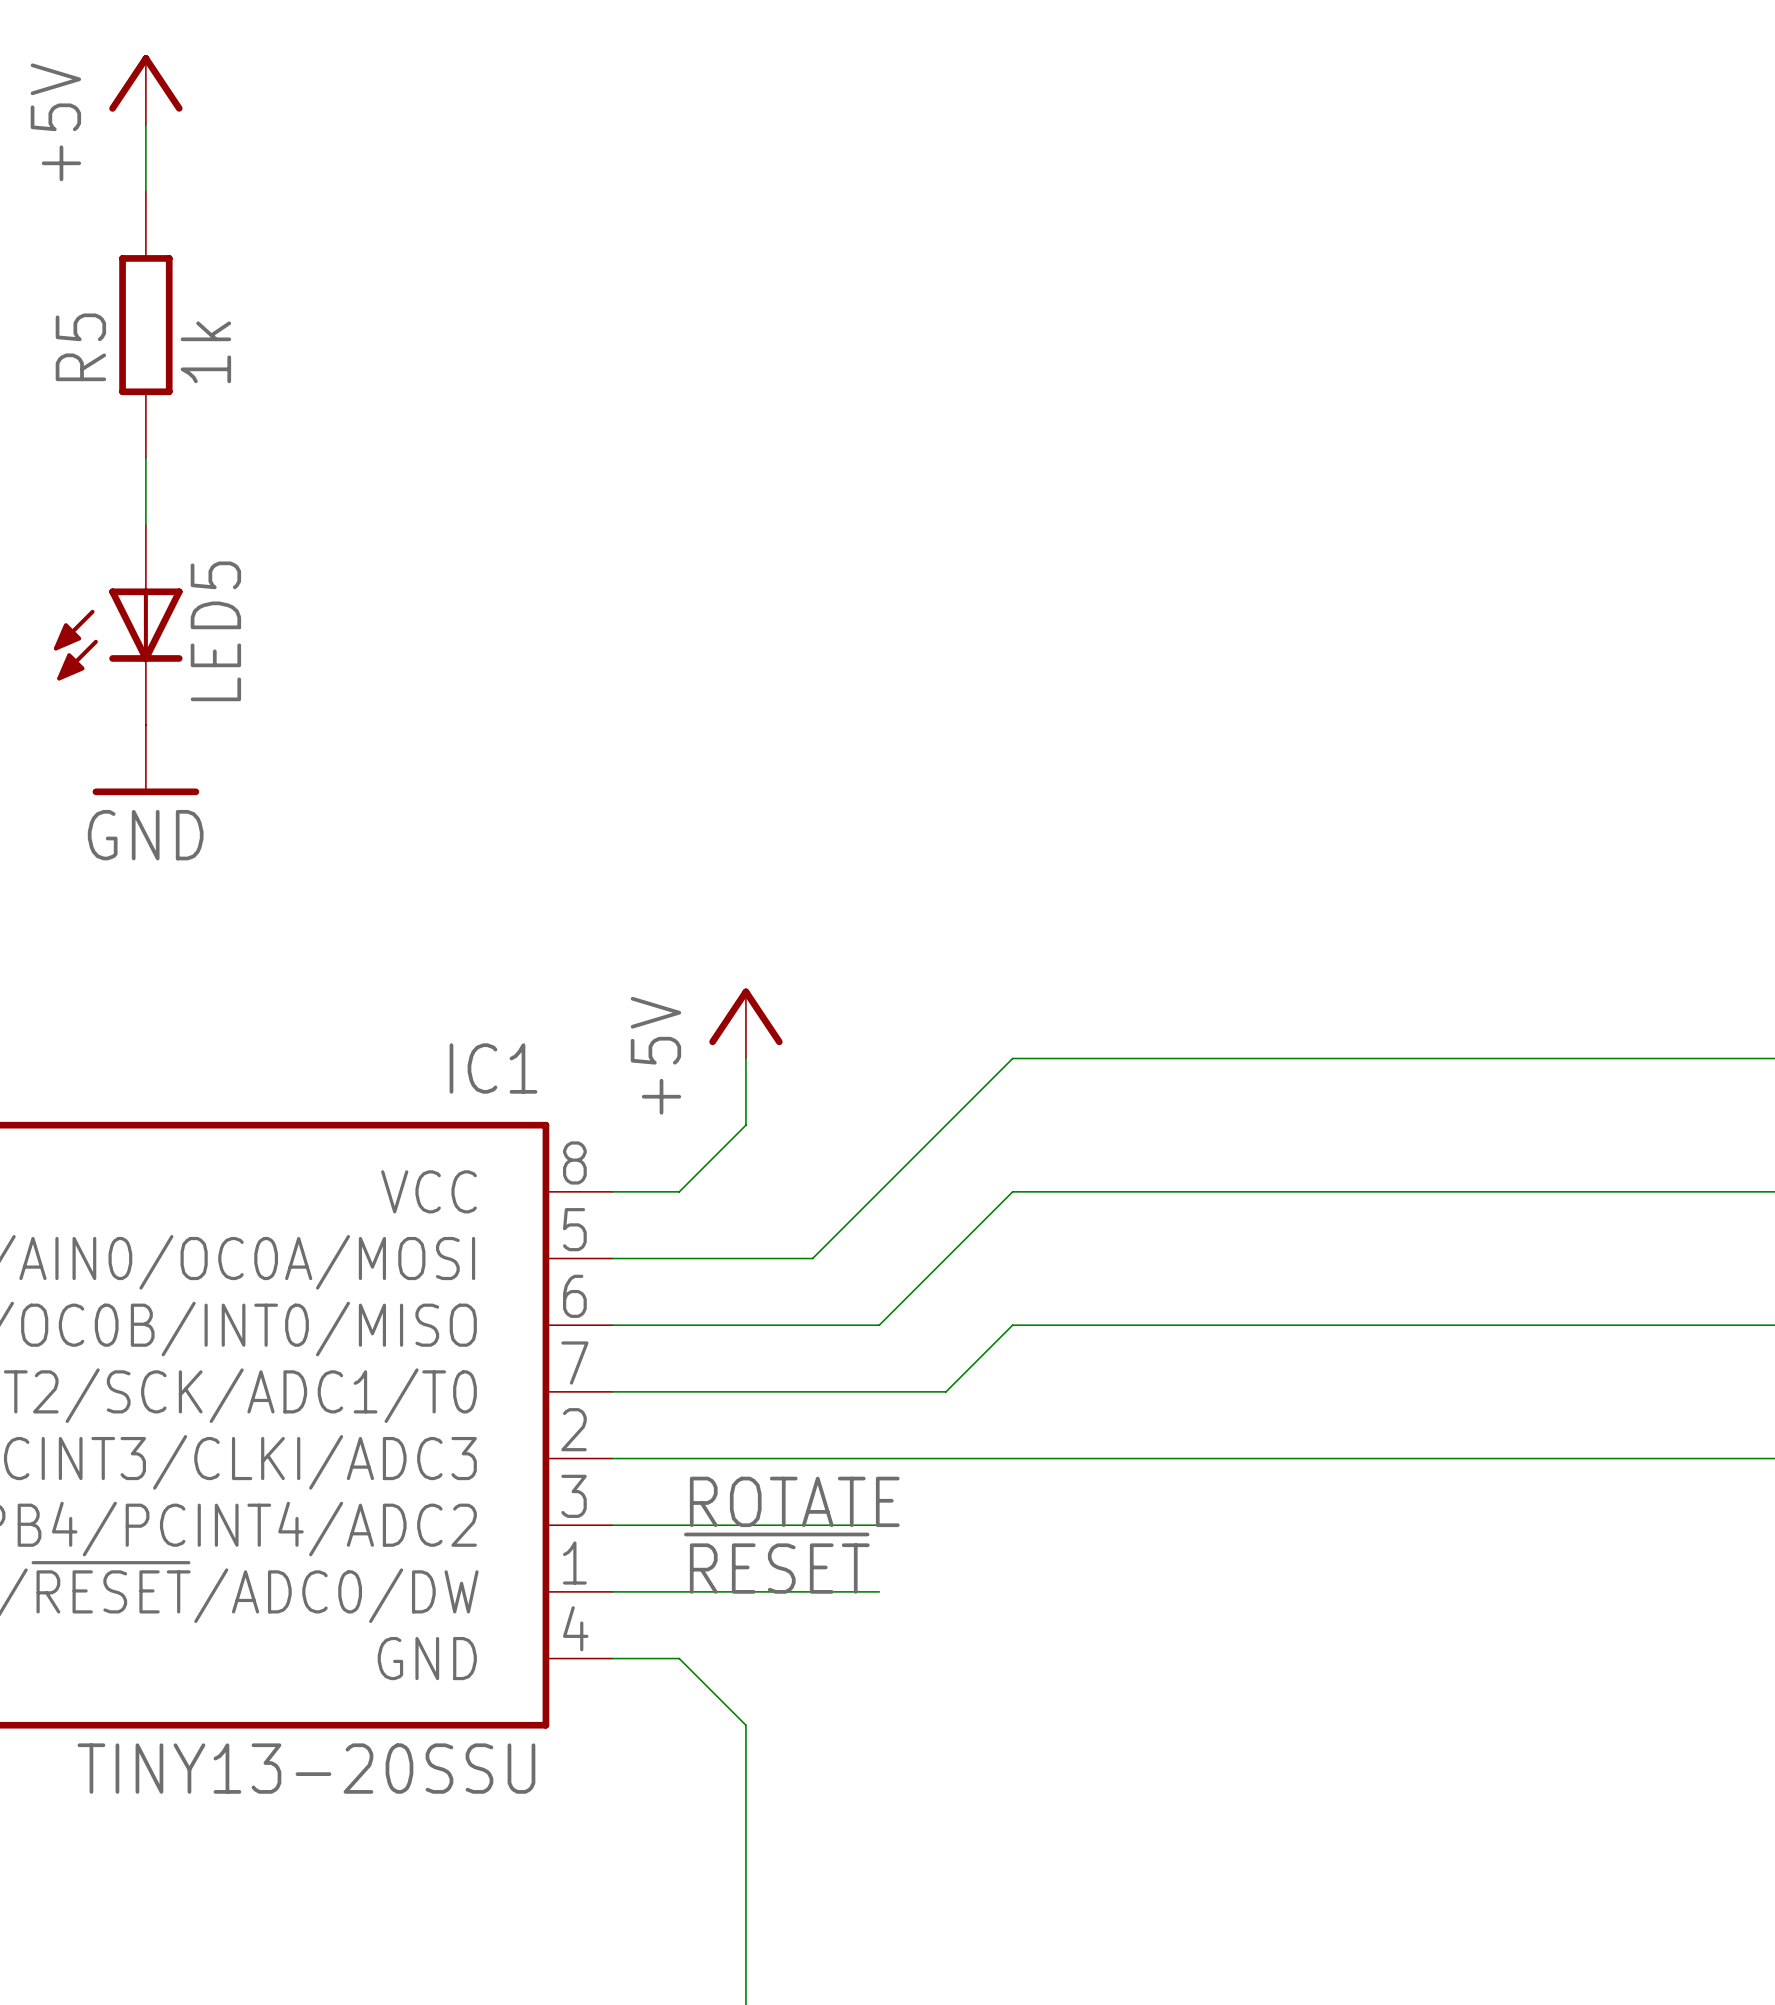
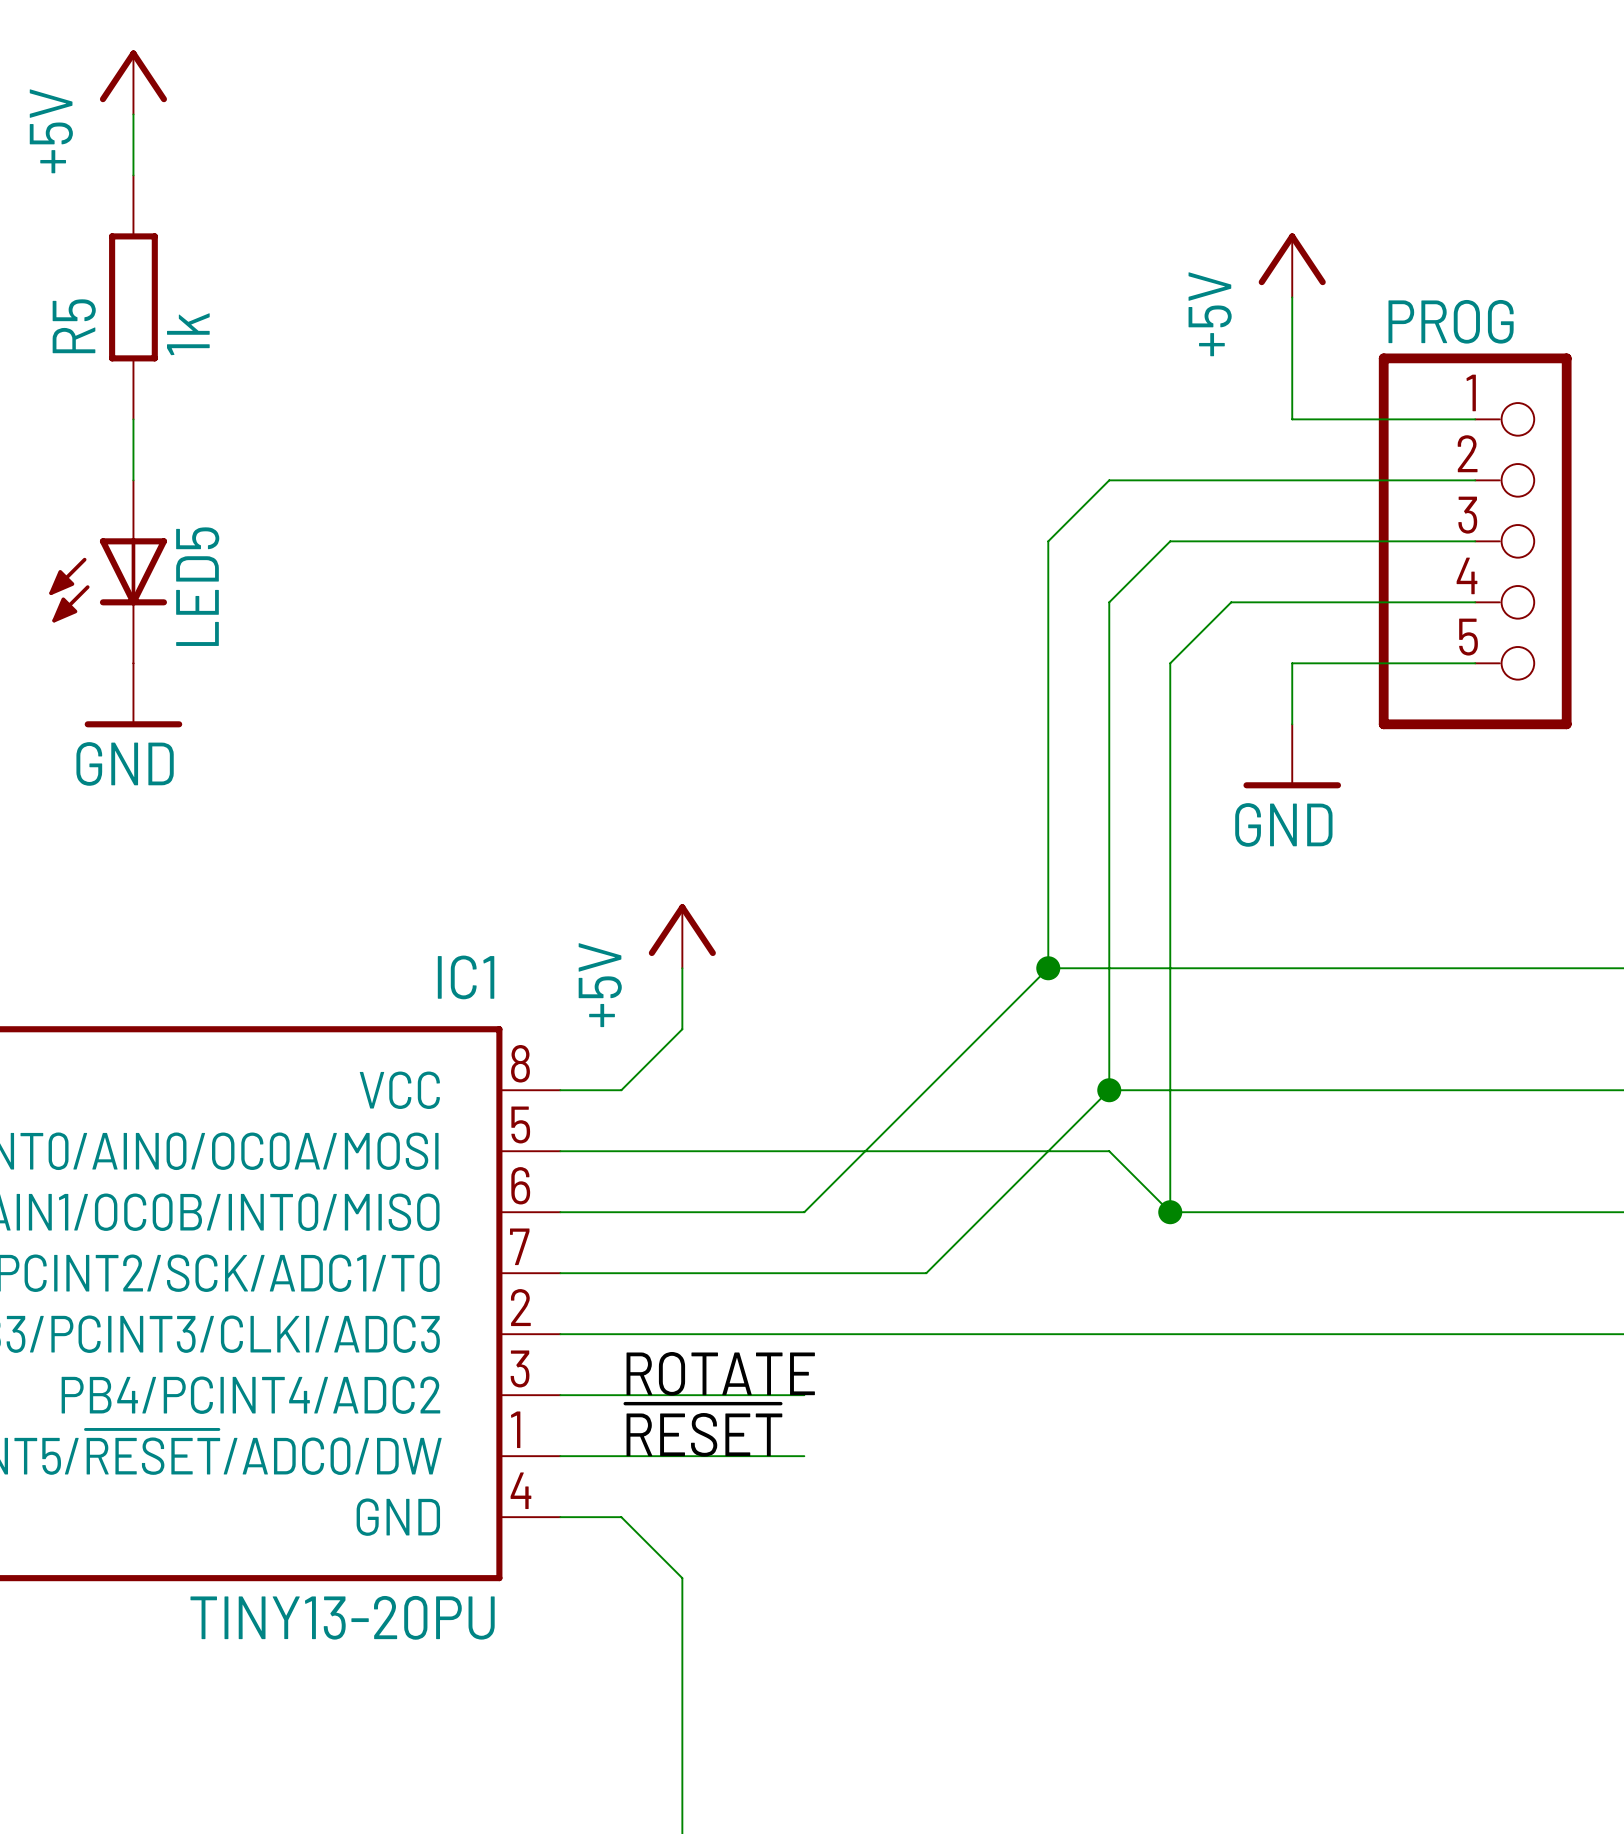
power symbol: none -> +5V (1292, 265)
wire: none -> (1292, 297) (1292, 419) (1475, 419)
PROG: none -> (1475, 541)
wire: none -> (1475, 663) (1292, 663) (1292, 724)
power symbol: none -> GND (1292, 756)
wire: (1145, 1058) (1012, 1058) (812, 1258) -> (1475, 602) (1231, 602) (1170, 663) (1170, 1212) (1109, 1151) (743, 1151)
junction: none -> (1048, 968)
wire: (1012, 1191) (1212, 1191) -> (926, 1090) (1048, 968) (1048, 541) (1109, 480) (1475, 480)
junction: none -> (1109, 1090)
wire: (1279, 1325) (1012, 1325) (945, 1391) -> (1475, 541) (1170, 541) (1109, 602) (1109, 1090) (926, 1273) (865, 1273)
junction: none -> (1170, 1212)
IC1 value: TINY13-20SSU (306, 1768) -> TINY13-20PU (342, 1617)

